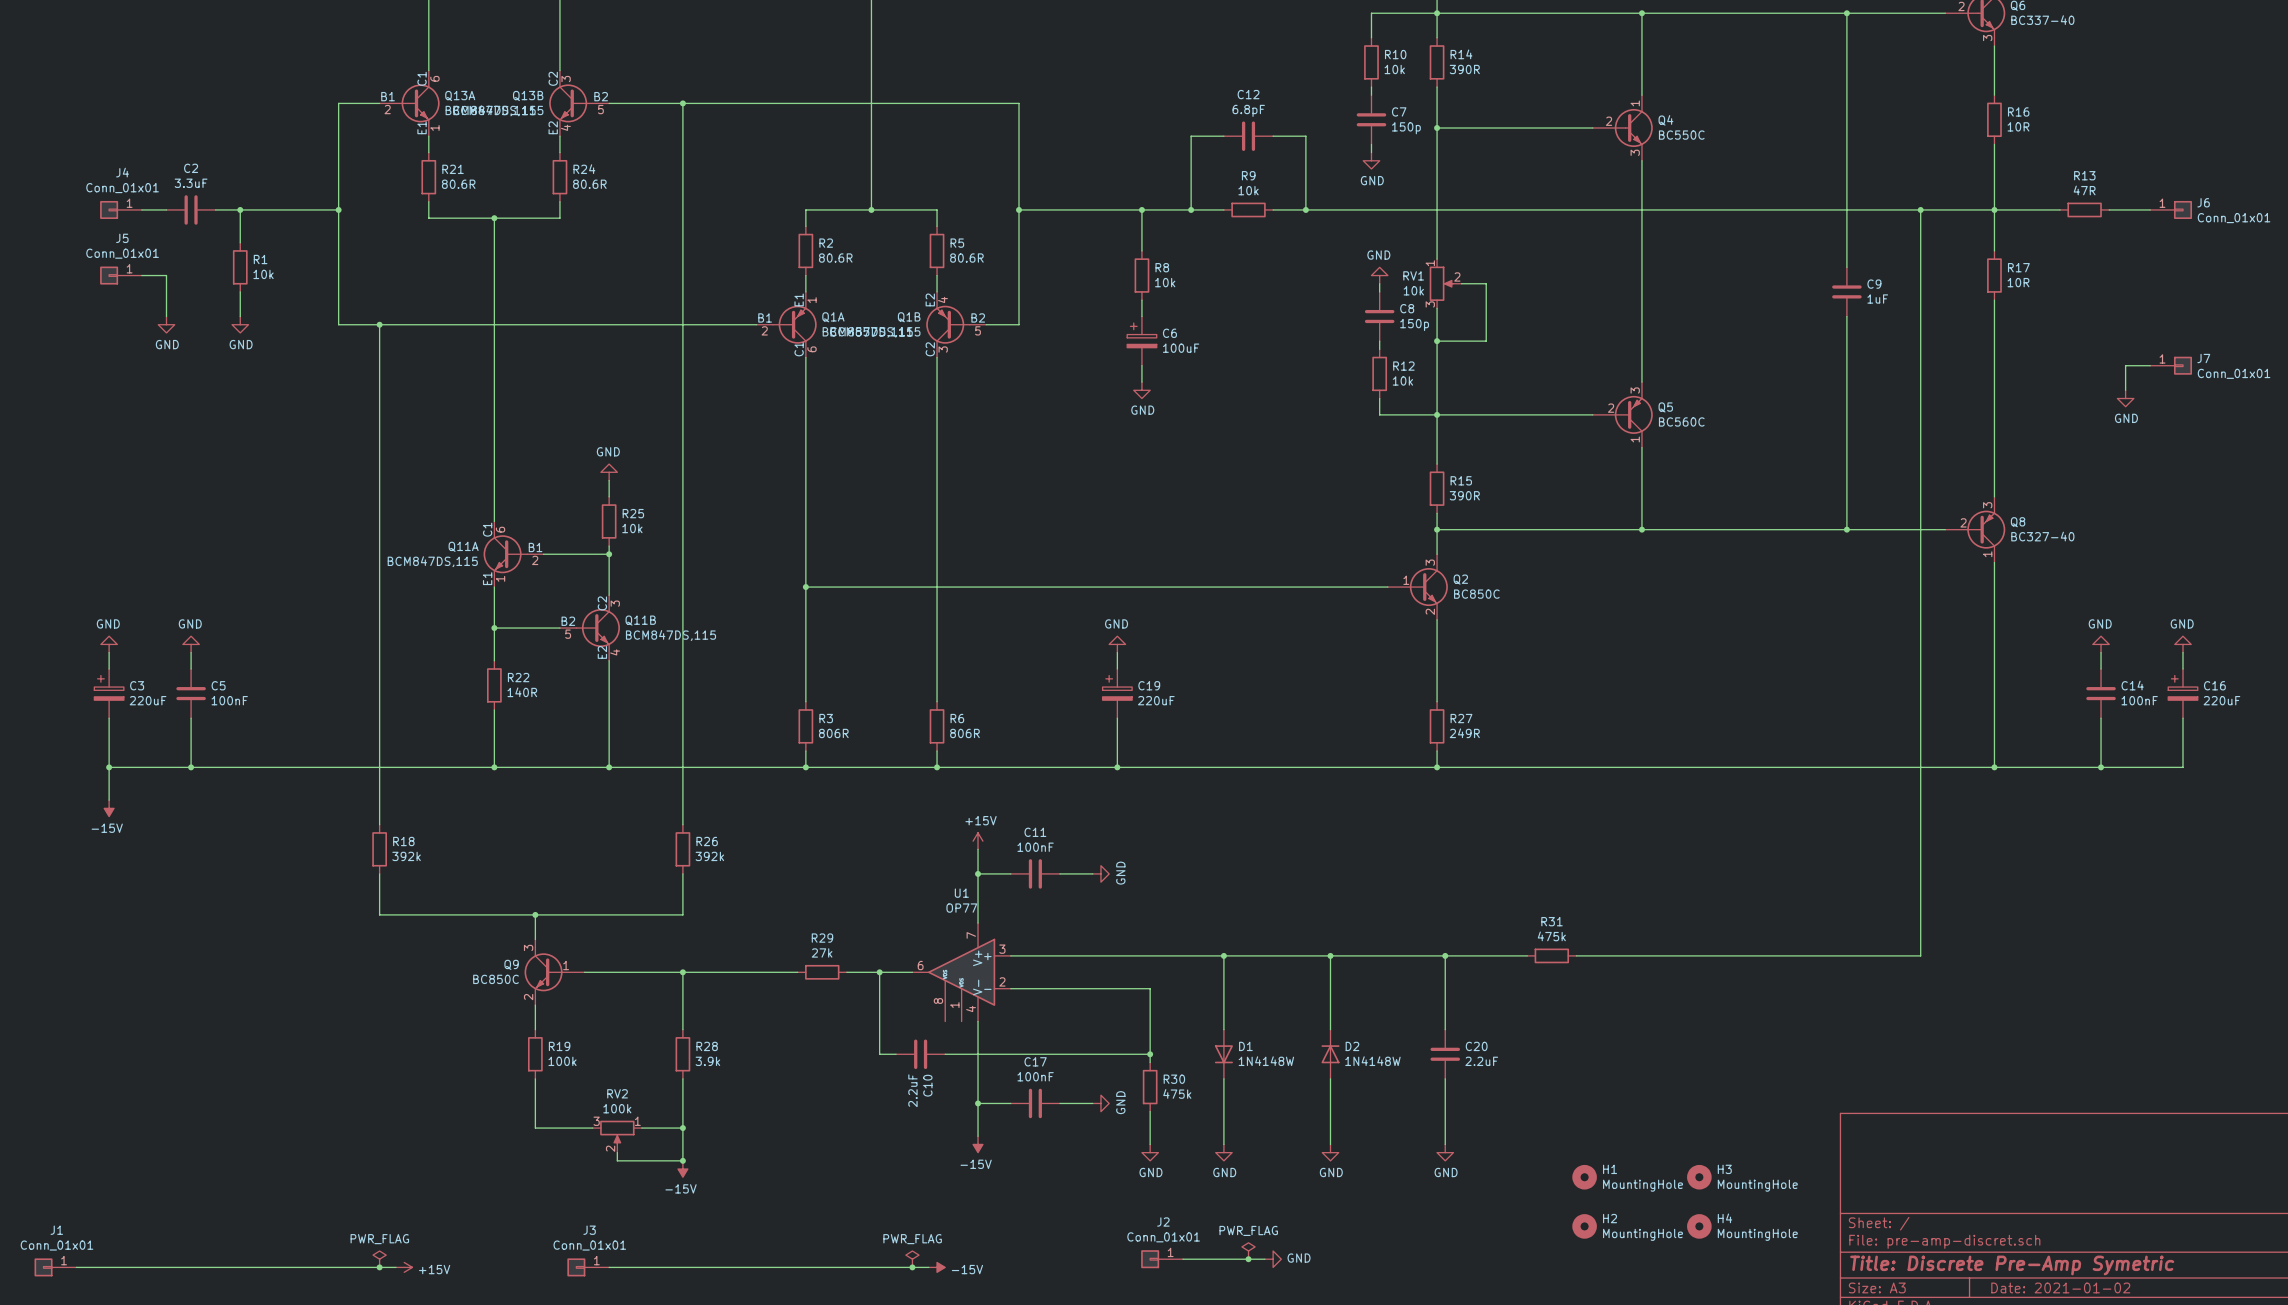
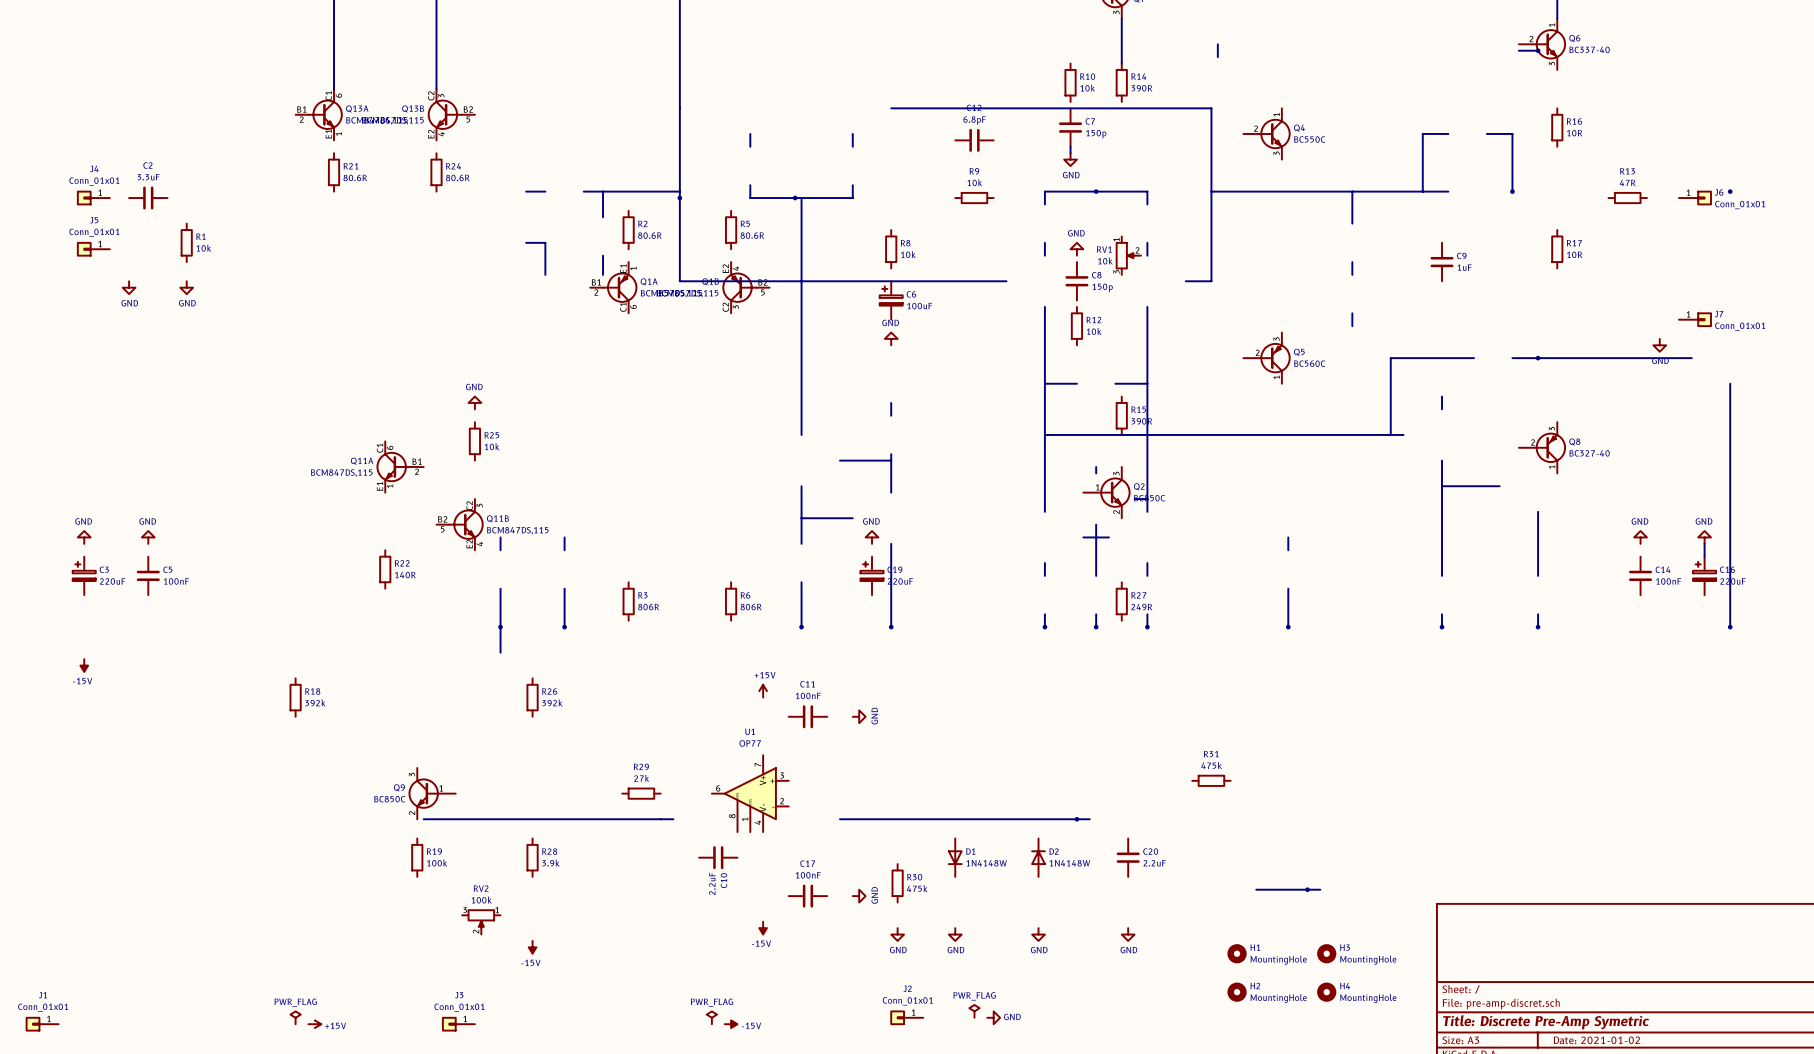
junction: (1437, 13) -> none
wire: none -> (1217, 44) (1217, 57)
wire: (1641, 13) (1641, 95) -> none
junction: (1641, 13) -> none
wire: (1846, 13) (1846, 267) -> none
junction: (1846, 13) -> none
wire: (1945, 13) (1371, 13) (1371, 37) -> none
wire: none -> (1518, 50) (1538, 50)
junction: none -> (1538, 50)
wire: (1994, 46) (1994, 95) -> none
wire: (1371, 87) (1371, 95) -> none
wire: (1437, 87) (1437, 259) -> none
wire: none -> (891, 108) (1211, 108) (1211, 281) (1185, 281)
wire: (379, 103) (338, 103) (338, 324) (756, 324) -> none
wire: (609, 103) (1019, 103) (1019, 324) (986, 324) -> none
wire: (682, 103) (682, 824) -> none
junction: (682, 103) -> none
wire: none -> (852, 133) (852, 146)
wire: (1437, 128) (1592, 128) -> none
junction: (1437, 128) -> none
wire: none -> (1448, 133) (1422, 133) (1422, 191)
wire: none -> (1486, 133) (1512, 133) (1512, 191)
wire: (428, 136) (428, 152) -> none
wire: (559, 136) (559, 152) -> none
wire: (1223, 136) (1191, 136) (1191, 209) -> none
wire: (1273, 136) (1305, 136) (1305, 209) -> none
wire: (1994, 144) (1994, 250) -> none
wire: (1641, 160) (1641, 382) -> none
wire: none -> (750, 185) (750, 198) (795, 198)
wire: (428, 201) (428, 218) (559, 218) (559, 201) -> none
wire: none -> (526, 191) (545, 191)
wire: none -> (583, 191) (679, 191)
wire: none -> (603, 191) (603, 217)
junction: none -> (1096, 191)
wire: none -> (1211, 191) (1448, 191)
wire: none -> (1352, 191) (1352, 223)
junction: none -> (1730, 191)
wire: (141, 209) (166, 209) -> none
wire: (215, 209) (338, 209) -> none
wire: (240, 209) (240, 242) -> none
junction: (240, 209) -> none
junction: (338, 209) -> none
wire: none -> (679, 198) (679, 281) (1006, 281)
wire: none -> (801, 198) (801, 434)
wire: (1092, 209) (1223, 209) -> (852, 198) (852, 185)
wire: (1141, 209) (1141, 250) -> none
junction: (1141, 209) -> none
junction: (1191, 209) -> none
wire: (1273, 209) (2060, 209) -> none
junction: (1305, 209) -> none
wire: (1920, 209) (1920, 955) (1576, 955) -> none
junction position: (1920, 209) -> (1512, 191)
junction: (1994, 209) -> none
wire: (2109, 209) (2150, 209) -> none
wire: (494, 218) (494, 521) -> none
junction: (494, 218) -> none
wire: none -> (1044, 204) (1044, 191) (1147, 191) (1147, 204)
wire: (805, 226) (805, 209) (937, 209) (937, 226) -> none
wire: none -> (526, 242) (545, 242) (545, 274)
wire: none -> (1044, 242) (1044, 255)
wire: none -> (1147, 242) (1147, 255)
wire: (141, 275) (166, 275) (166, 316) -> none
wire: (805, 275) (805, 291) -> none
wire: (937, 275) (937, 291) -> (750, 133) (750, 146)
wire: none -> (603, 255) (603, 274)
wire: (1379, 283) (1379, 291) -> none
wire: (1461, 283) (1486, 283) (1486, 341) (1437, 341) -> none
wire: (240, 291) (240, 316) -> none
wire: none -> (1352, 262) (1352, 274)
wire: (1141, 300) (1141, 316) -> none
wire: (1994, 300) (1994, 496) -> none
wire: (1437, 308) (1437, 464) -> none
wire: (1846, 316) (1846, 464) -> none
wire: (379, 324) (379, 824) -> none
junction: (379, 324) -> none
wire: (1379, 341) (1379, 349) -> none
junction: (1437, 341) -> none
wire: none -> (1044, 306) (1044, 511)
wire: none -> (1147, 306) (1147, 511)
wire: (805, 357) (805, 701) -> none
wire: (937, 357) (937, 701) -> none
wire: none -> (1352, 313) (1352, 326)
wire: (1141, 365) (1141, 382) -> (891, 402) (891, 415)
wire: (2150, 365) (2125, 365) (2125, 390) -> none
power symbol rotation: 0° (1141, 390) -> 180° (891, 338)
wire: (1379, 398) (1379, 414) (1592, 414) -> none
junction: (1437, 414) -> none
wire: none -> (1474, 358) (1390, 358) (1390, 434)
wire: none -> (1512, 358) (1691, 358)
junction: none -> (1538, 358)
wire: none -> (1044, 383) (1076, 383)
wire: none -> (1115, 383) (1147, 383)
wire: (1641, 447) (1641, 529) -> none
wire: none -> (1730, 383) (1730, 627)
wire: (609, 480) (609, 496) -> none
wire: (1846, 480) (1846, 529) -> none
wire: none -> (1044, 434) (1403, 434)
wire: (1437, 513) (1437, 554) -> none
wire: (1437, 529) (1945, 529) -> none
junction: (1437, 529) -> none
junction: (1641, 529) -> none
junction: (1846, 529) -> none
wire: none -> (891, 454) (891, 492)
wire: (609, 546) (609, 595) -> none
wire: none -> (839, 460) (891, 460)
wire: none -> (1442, 460) (1442, 575)
wire: (543, 554) (609, 554) -> none
junction: (609, 554) -> none
wire: none -> (1096, 467) (1096, 473)
wire: (1994, 562) (1994, 767) -> none
wire: none -> (801, 486) (801, 543)
wire: none -> (1442, 486) (1499, 486)
wire: (494, 587) (494, 660) -> none
wire: (805, 587) (1387, 587) -> none
junction: (805, 587) -> none
wire: none -> (1134, 499) (1147, 499)
wire: none -> (1538, 511) (1538, 575)
wire: none -> (801, 518) (852, 518)
wire: (1437, 619) (1437, 701) -> none
wire: (494, 628) (559, 628) -> none
junction: (494, 628) -> none
wire: none -> (1096, 524) (1096, 575)
wire: none -> (500, 537) (500, 550)
wire: none -> (1083, 537) (1108, 537)
wire: none -> (1288, 537) (1288, 550)
wire: (109, 652) (109, 669) -> none
wire: (191, 652) (191, 669) -> none
wire: (1117, 652) (1117, 669) -> none
wire: none -> (891, 543) (891, 627)
wire: (2101, 652) (2101, 669) -> (1538, 614) (1538, 627)
wire: (609, 660) (609, 767) -> none
wire: none -> (1044, 563) (1044, 575)
wire: none -> (1147, 563) (1147, 575)
wire: none -> (801, 582) (801, 627)
wire: (494, 710) (494, 767) -> none
wire: none -> (500, 588) (500, 652)
wire: none -> (564, 588) (564, 627)
wire: none -> (1288, 588) (1288, 627)
wire: (109, 718) (109, 800) -> none
wire: (191, 718) (191, 767) -> none
wire: (1117, 718) (1117, 767) -> none
wire: (2101, 718) (2101, 767) -> none
wire: (2182, 718) (2182, 767) (109, 767) -> none
wire: none -> (1044, 614) (1044, 627)
wire: none -> (1096, 614) (1096, 627)
wire: none -> (1442, 614) (1442, 627)
wire: (805, 750) (805, 767) -> (564, 537) (564, 550)
wire: (937, 750) (937, 767) -> none
wire: (1437, 750) (1437, 767) -> (1147, 614) (1147, 627)
junction: none -> (564, 627)
junction: none -> (801, 627)
junction: none -> (1044, 627)
junction: none -> (1096, 627)
junction: none -> (1147, 627)
junction: none -> (1288, 627)
junction: none -> (1442, 627)
junction: none -> (1730, 627)
junction: (109, 767) -> none
junction: (191, 767) -> none
junction: (494, 767) -> none
junction position: (609, 767) -> (500, 627)
junction: (805, 767) -> none
junction: (937, 767) -> none
junction position: (1117, 767) -> (891, 627)
junction: (1437, 767) -> none
junction position: (1994, 767) -> (1538, 627)
junction: (2101, 767) -> none
wire: (978, 849) (978, 923) -> none
wire: (379, 873) (379, 914) (682, 914) (682, 873) -> none
wire: (978, 873) (1010, 873) -> none
junction: (978, 873) -> none
wire: (1059, 873) (1092, 873) -> none
wire: (535, 914) (535, 939) -> none
junction: (535, 914) -> none
wire: (1010, 955) (1527, 955) -> none
wire: (1223, 955) (1223, 1029) -> none
junction: (1223, 955) -> none
wire: (1330, 955) (1330, 1029) -> none
junction: (1330, 955) -> none
wire: (1445, 955) (1445, 1029) -> none
junction: (1445, 955) -> none
wire: (584, 972) (797, 972) -> none
wire: (682, 972) (682, 1029) -> none
junction: (682, 972) -> none
wire: (846, 972) (912, 972) -> none
wire: (879, 972) (879, 1054) (896, 1054) -> none
junction: (879, 972) -> none
wire: (1010, 988) (1150, 988) (1150, 1062) -> none
wire: (535, 1005) (535, 1029) -> none
wire: none -> (423, 819) (673, 819)
wire: none -> (839, 819) (1089, 819)
junction: none -> (1076, 819)
wire: (978, 1021) (978, 1136) -> none
wire: (945, 1054) (1150, 1054) -> none
junction: (1150, 1054) -> none
wire: (535, 1078) (535, 1128) (592, 1128) -> none
wire: (682, 1078) (682, 1160) (617, 1160) (617, 1152) -> none
wire: (1223, 1078) (1223, 1144) -> none
wire: (1330, 1078) (1330, 1144) -> none
wire: (1445, 1078) (1445, 1144) -> none
wire: none -> (1256, 889) (1320, 889)
junction: none -> (1307, 889)
wire: (978, 1103) (1010, 1103) -> none
junction: (978, 1103) -> none
wire: (1059, 1103) (1092, 1103) -> none
wire: (1150, 1111) (1150, 1144) -> none
wire: (641, 1128) (682, 1128) -> none
junction: (682, 1128) -> none
junction: (682, 1160) -> none
wire: (1182, 1259) (1264, 1259) -> none
junction: (1248, 1259) -> none
wire: (76, 1267) (396, 1267) -> none
junction: (379, 1267) -> none
wire: (609, 1267) (928, 1267) -> none
junction: (912, 1267) -> none

